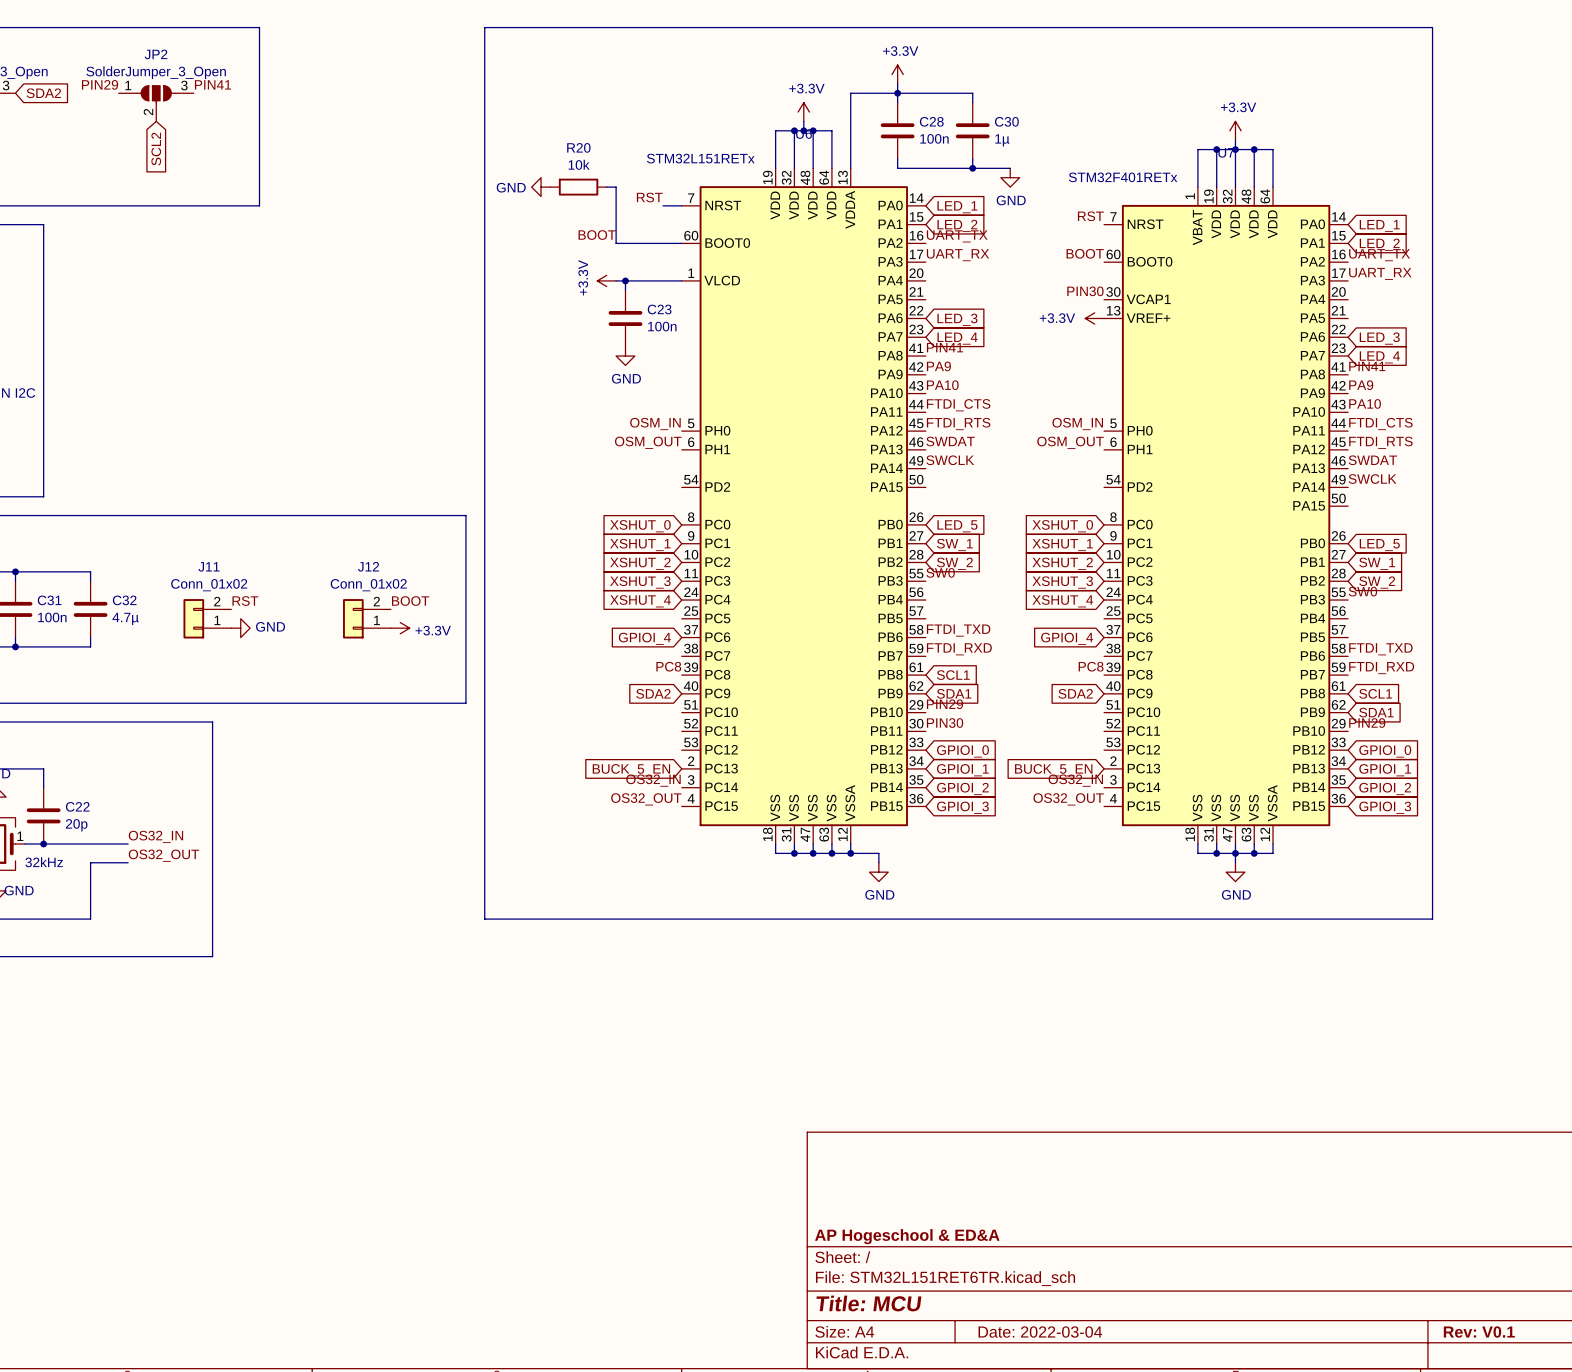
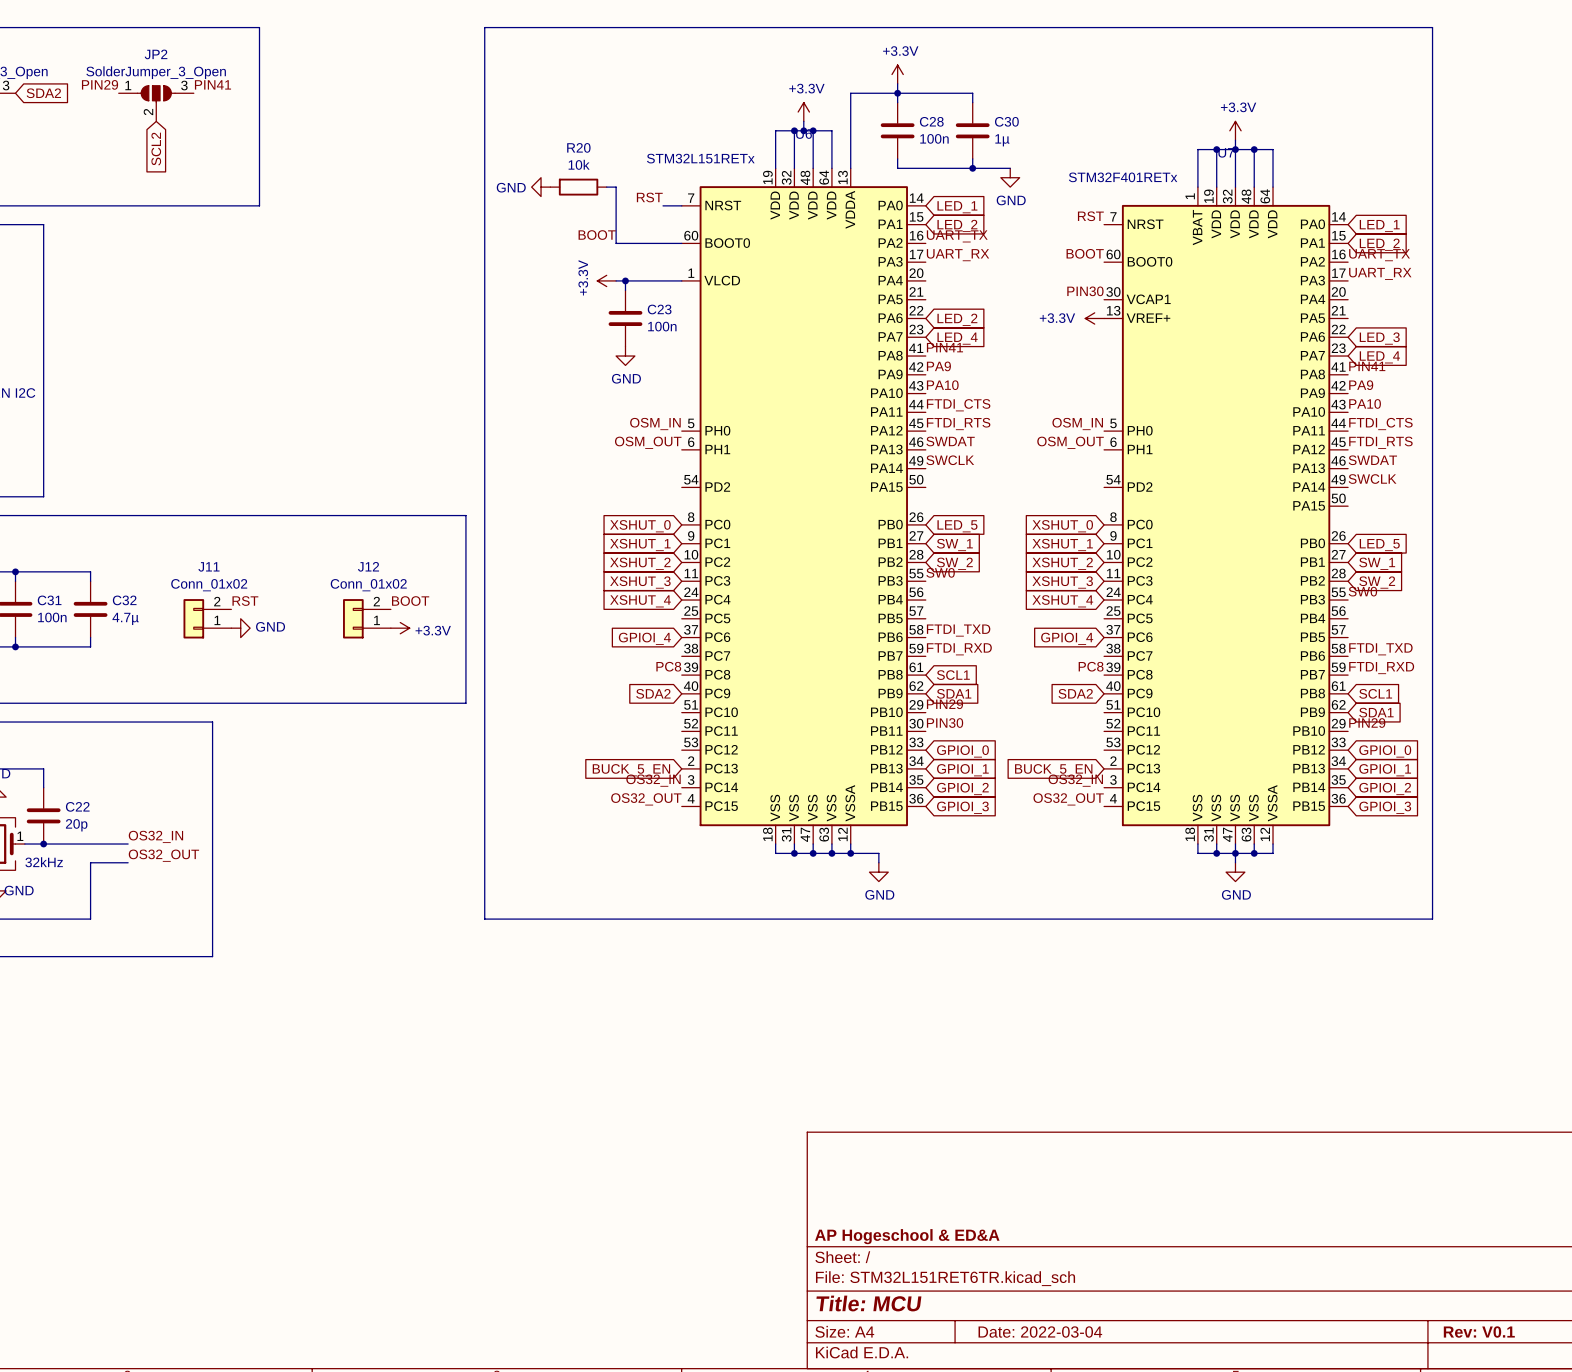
global label: LED_3 (957, 319) -> LED_2 (957, 319)

